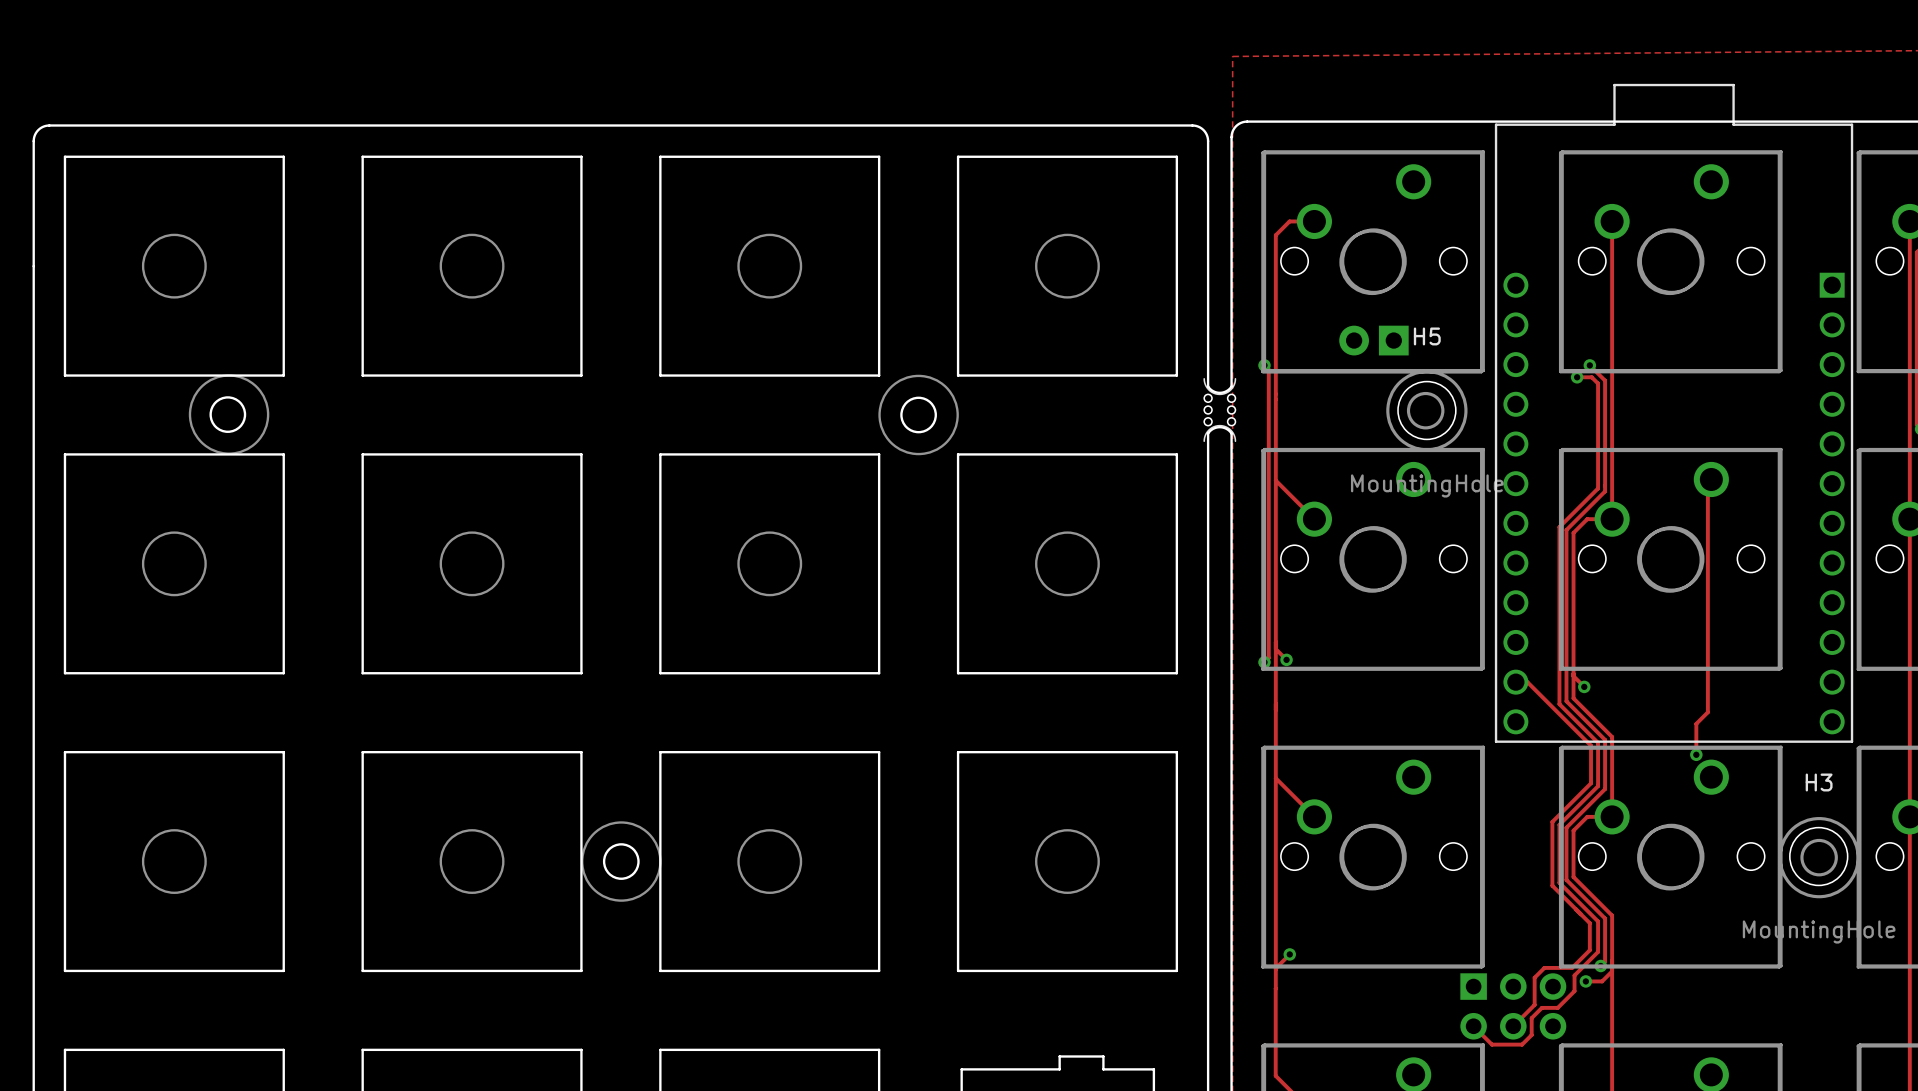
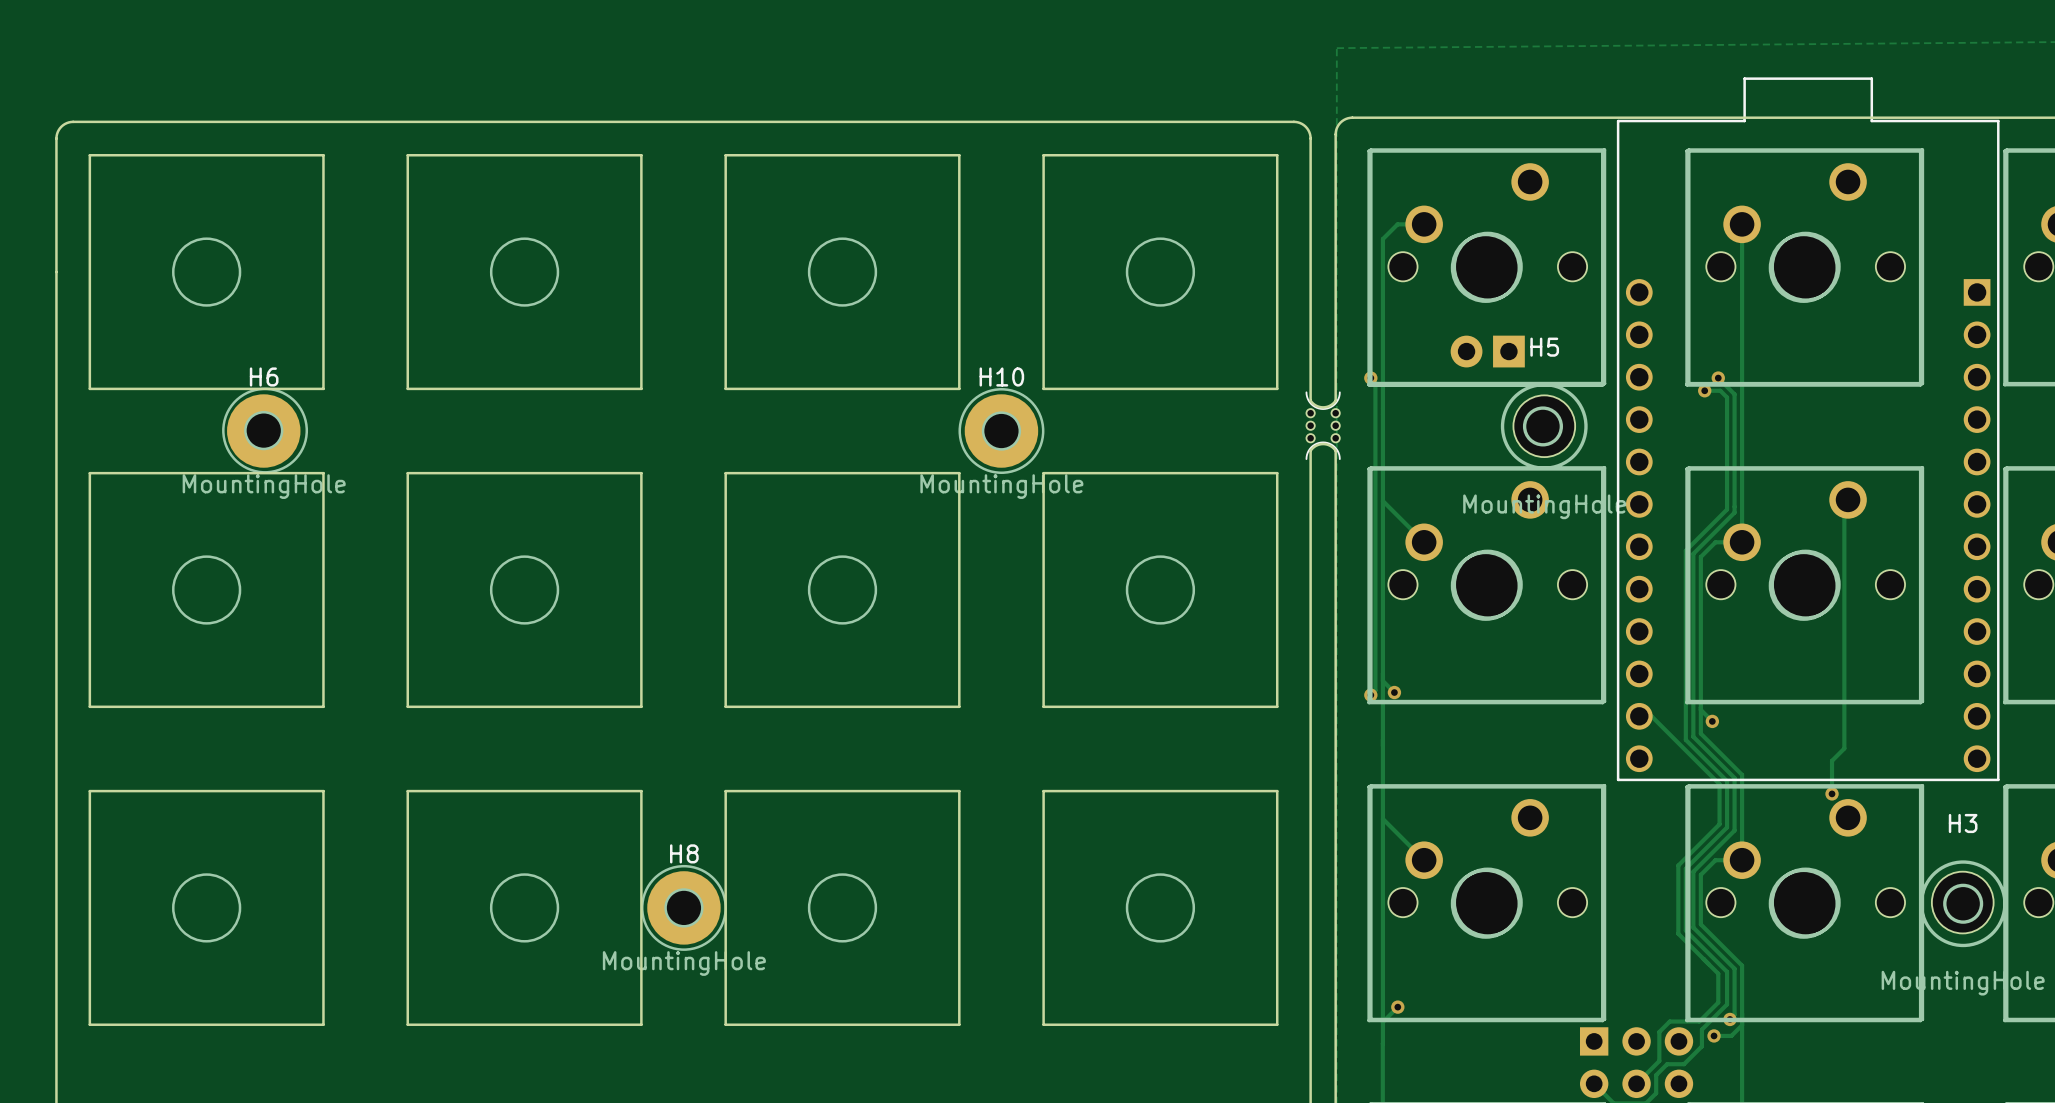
round board edge: [209, 396, 247, 433] -> none
drawing: none -> [244, 411, 284, 451]
round board edge: [900, 396, 937, 434] -> none
drawing: none -> [981, 411, 1022, 451]
H6: none -> MountingHole (263, 431)
H10: none -> MountingHole (1001, 431)
round board edge: [602, 843, 640, 880] -> none
drawing: none -> [664, 888, 704, 928]
H8: none -> MountingHole (683, 907)

